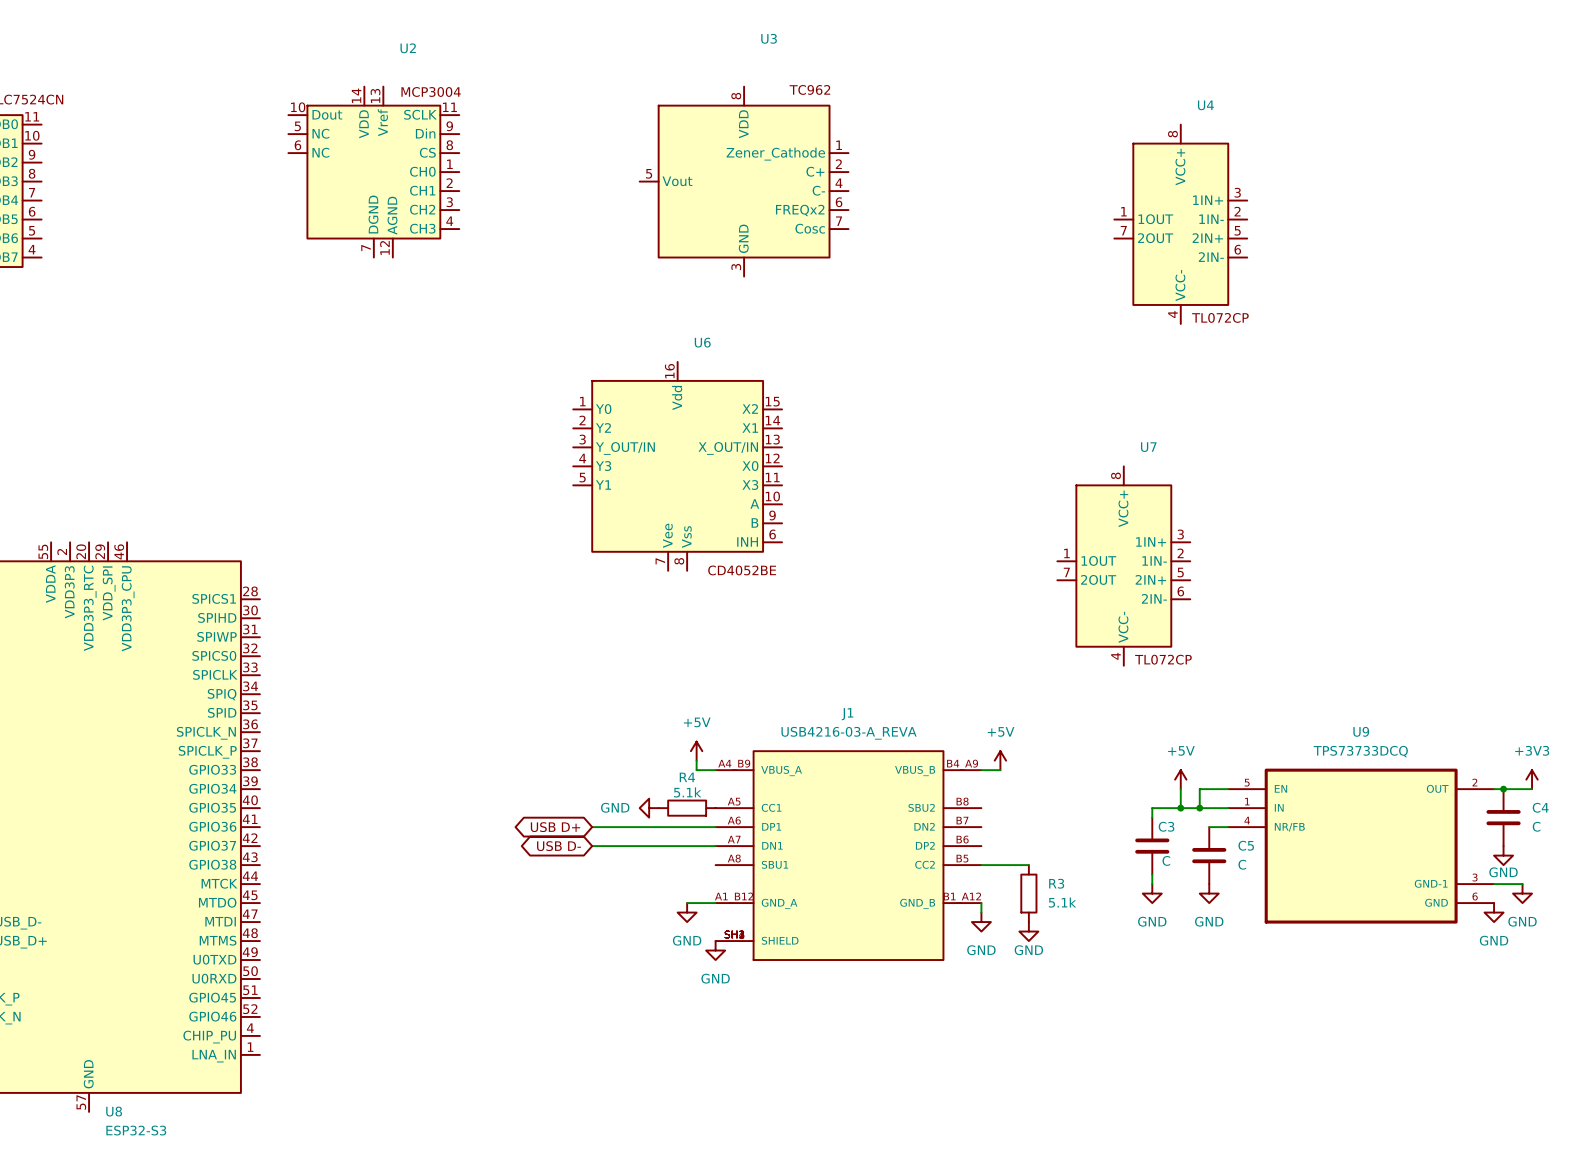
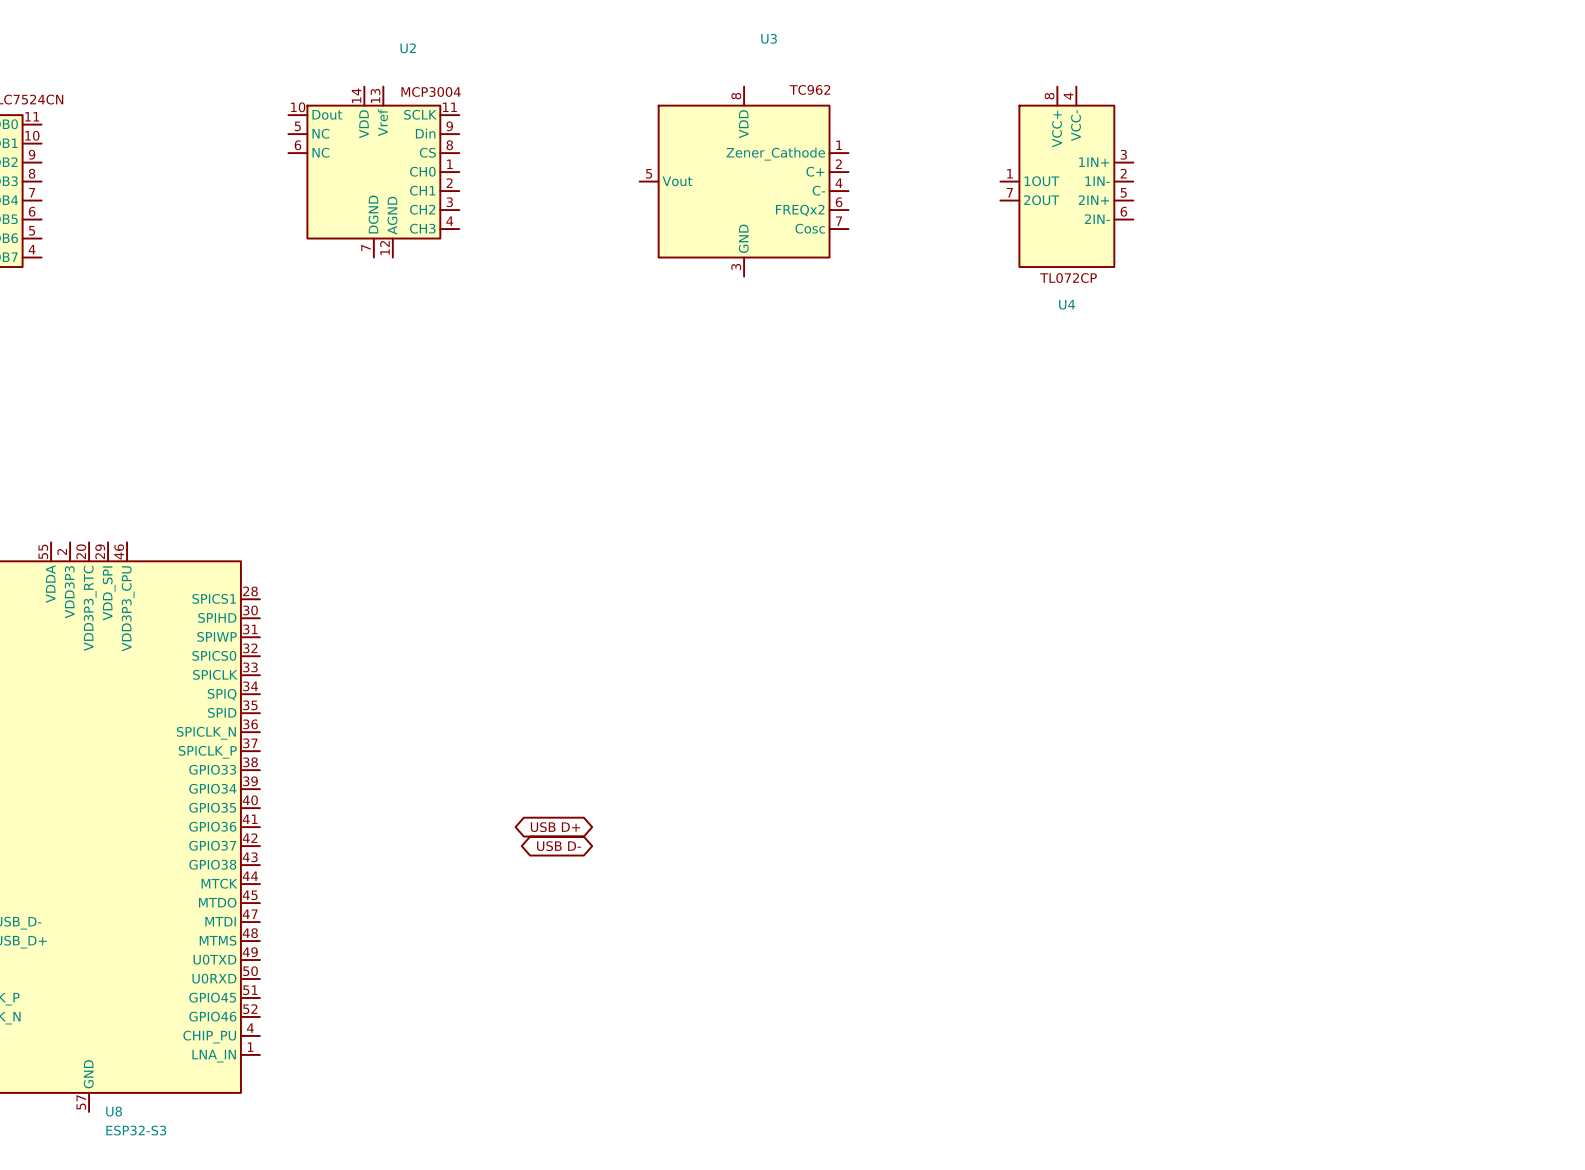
U4 name position: U4 (1205, 105) -> U4 (1067, 304)
U4 symbol: [1114, 124, 1248, 324] -> [1000, 86, 1134, 268]
U6: (677, 466) -> none
U7: (1123, 566) -> none
power symbol: +5V (696, 751) -> none
wire: (696, 760) (696, 770) (715, 770) -> none
power symbol: +5V (1000, 760) -> none
wire: (981, 770) (1000, 770) -> none
power symbol: +5V (1180, 779) -> none
power symbol: +3V3 (1532, 779) -> none
wire: (1180, 789) (1180, 808) -> none
wire: (1228, 789) (1199, 789) (1199, 808) -> none
wire: (1494, 789) (1532, 789) -> none
junction: (1503, 789) -> none
power symbol: GND (649, 808) -> none
R4: 5.1k (687, 808) -> none
junction: (1180, 808) -> none
junction: (1199, 808) -> none
wire: (1228, 808) (1152, 808) (1152, 817) -> none
C4: C (1503, 817) -> none
wire: (592, 827) (715, 827) -> none
wire: (1209, 827) (1228, 827) -> none
wire: (592, 846) (715, 846) -> none
C3: C (1152, 846) -> none
U9: TPS73733DCQ (1361, 846) -> none
J1: USB4216-03-A_REVA (848, 855) -> none
C5: C (1209, 855) -> none
power symbol: GND (1503, 855) -> none
wire: (981, 865) (1028, 865) -> none
wire: (1152, 874) (1152, 884) -> none
wire: (1494, 884) (1522, 884) -> none
R3: 5.1k (1028, 893) -> none
power symbol: GND (1152, 893) -> none
power symbol: GND (1209, 893) -> none
power symbol: GND (1522, 893) -> none
wire: (687, 903) (715, 903) -> none
wire: (981, 903) (981, 912) -> none
power symbol: GND (687, 912) -> none
power symbol: GND (1494, 912) -> none
power symbol: GND (981, 922) -> none
power symbol: GND (1028, 931) -> none
power symbol: GND (715, 950) -> none

